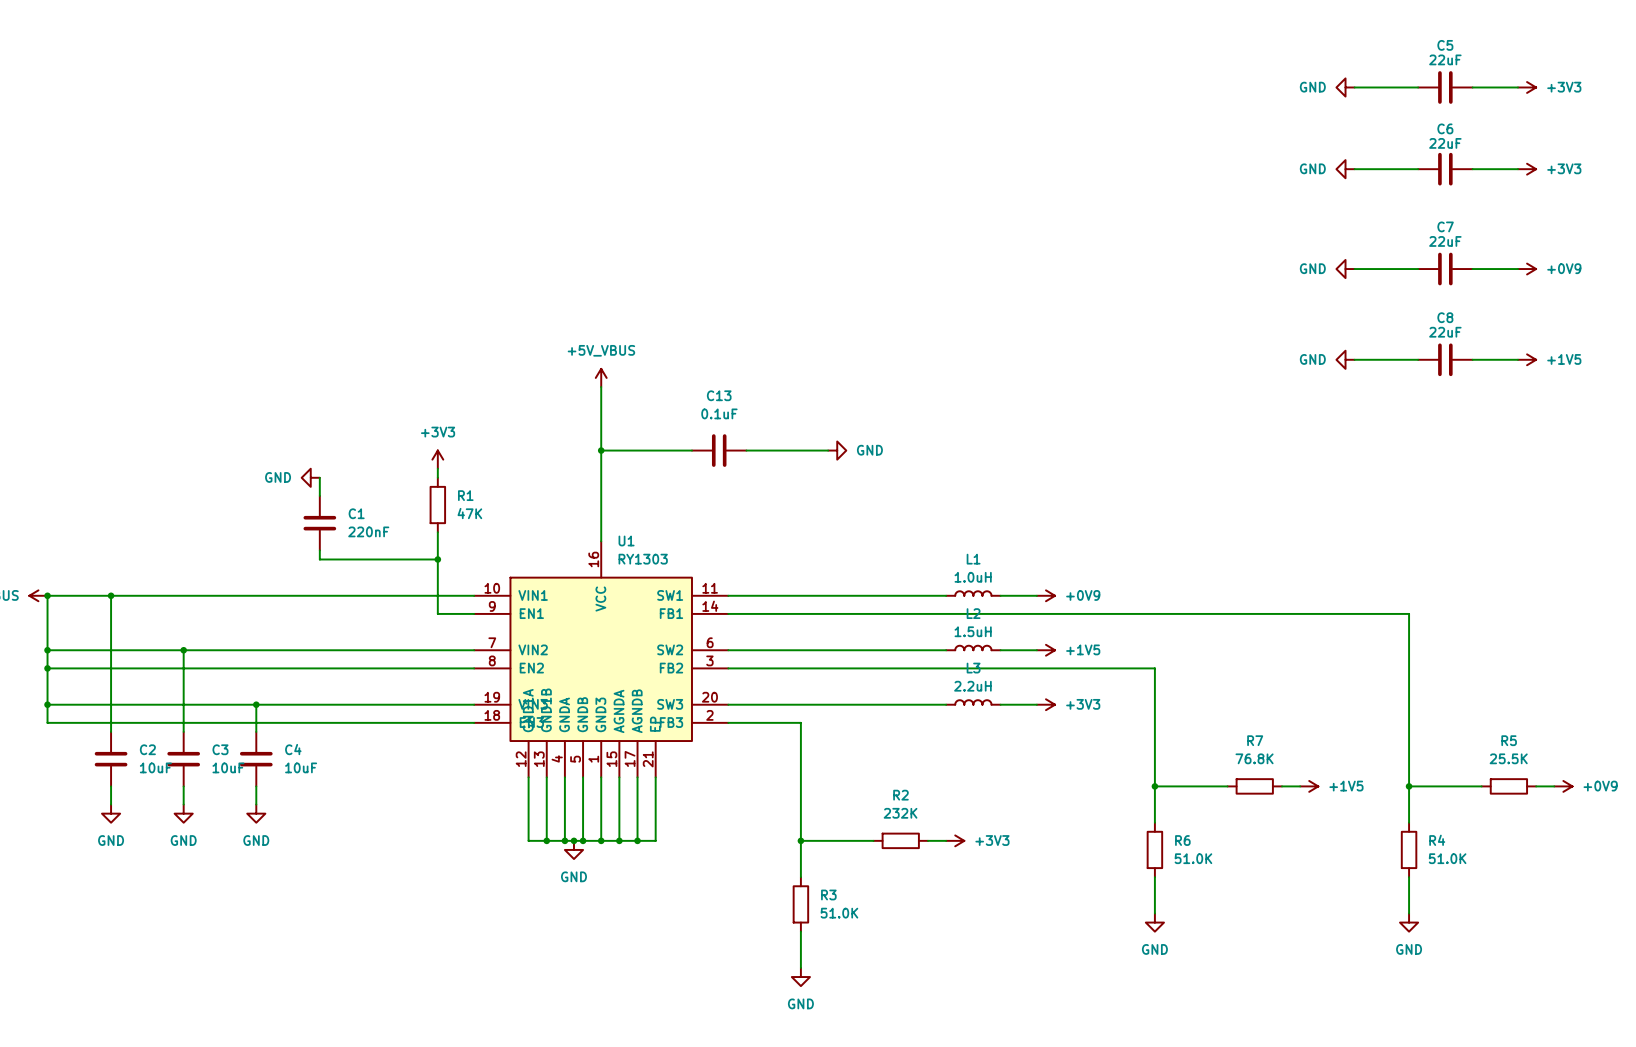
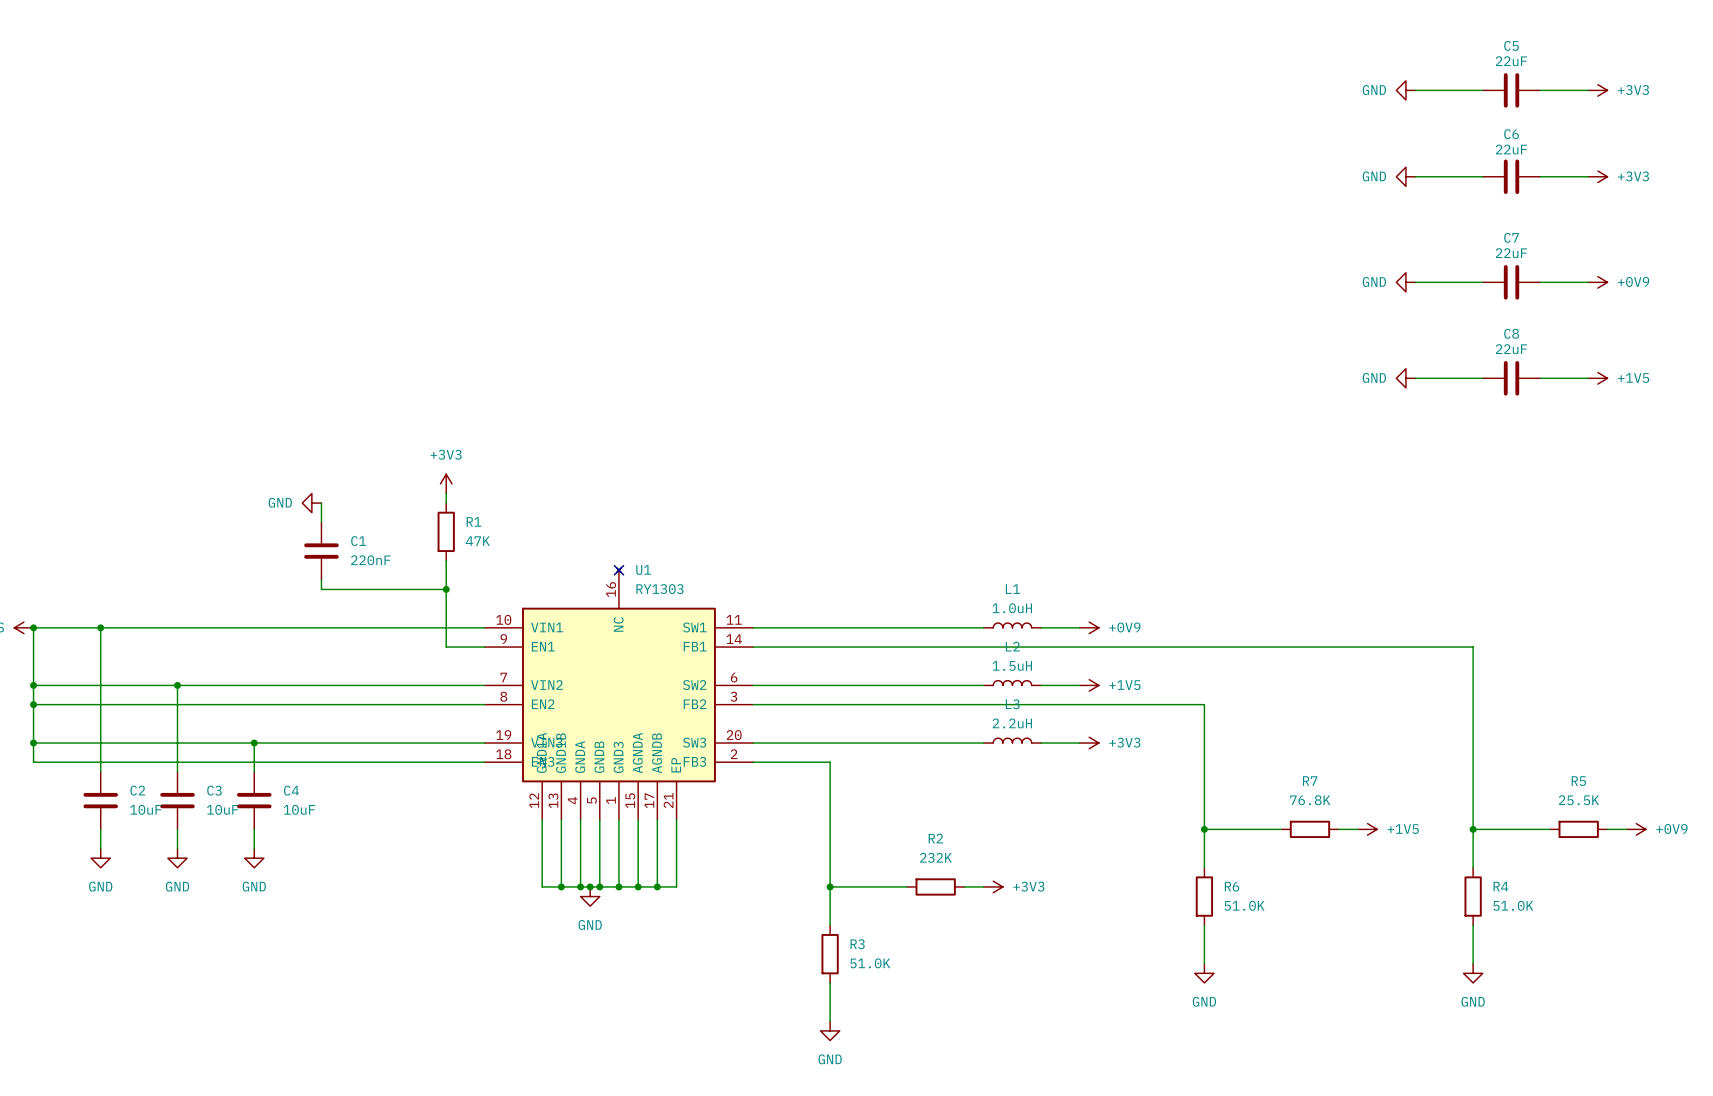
power symbol: +5V_VBUS (601, 377) -> none
wire: (601, 387) (601, 541) -> none
wire: (601, 450) (691, 450) -> none
junction: (601, 450) -> none
C13: 0.1uF (719, 450) -> none
wire: (746, 450) (828, 450) -> none
power symbol: GND (837, 450) -> none
U1 symbol: [474, 541, 729, 778] -> [484, 567, 754, 820]
no-connect mark: none -> (618, 570)

